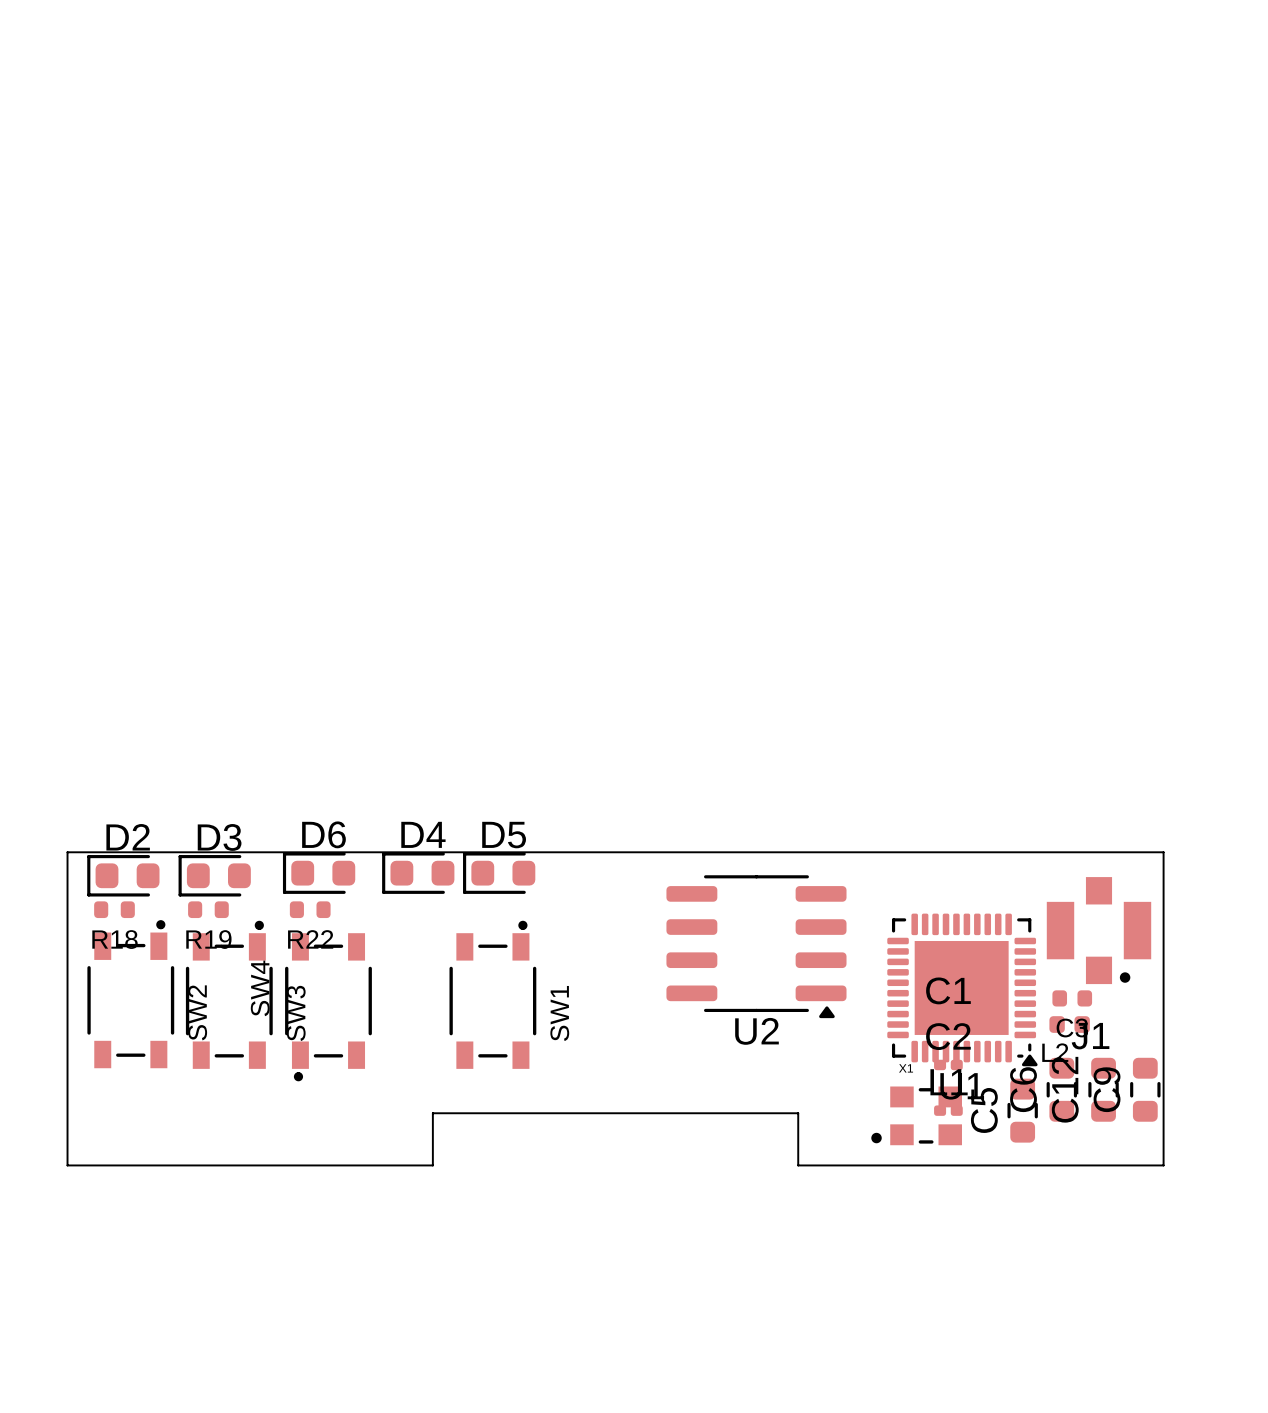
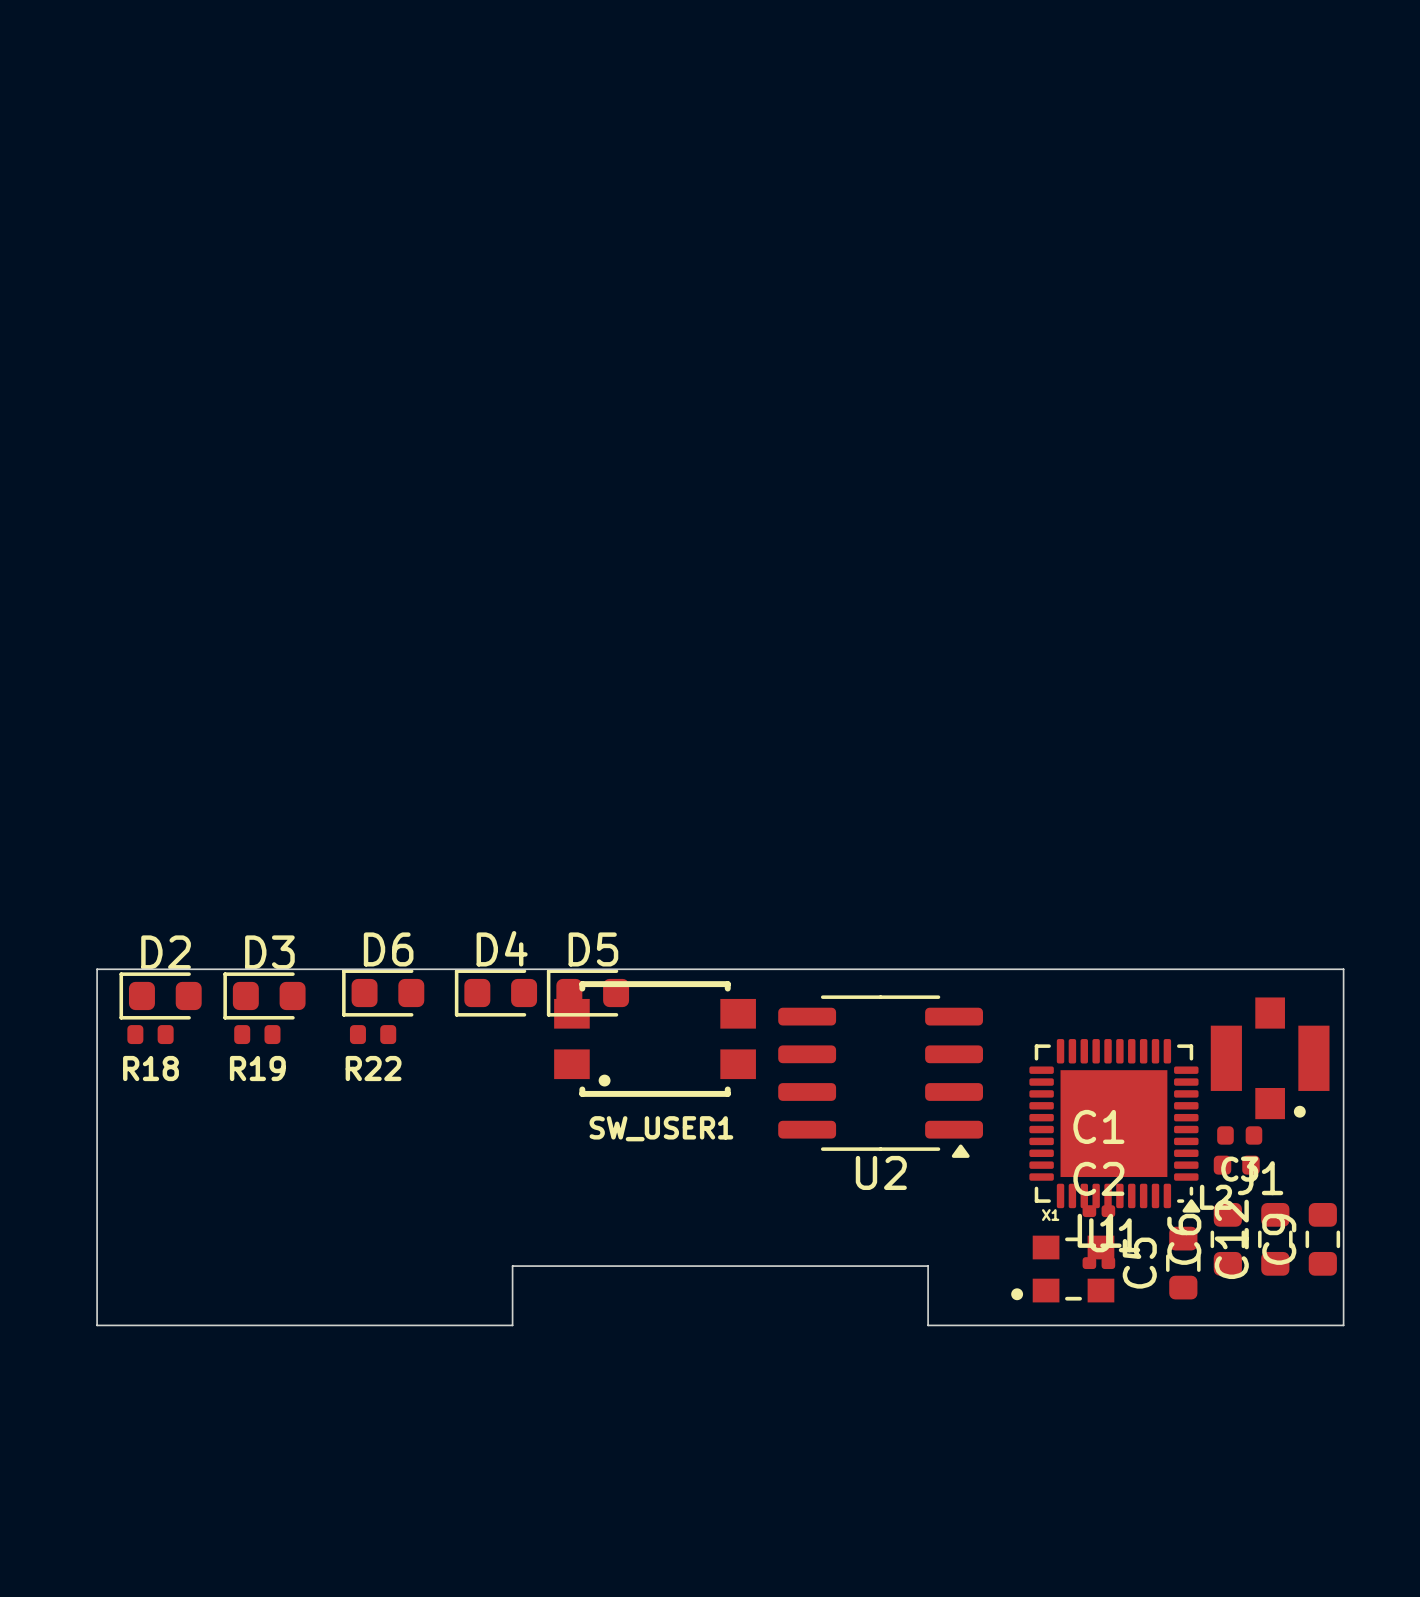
SW_USER1: none -> (655, 1039)
SW2: (130, 994) -> none
SW3: (229, 994) -> none
SW1: (492, 994) -> none
SW4: (328, 1007) -> none

